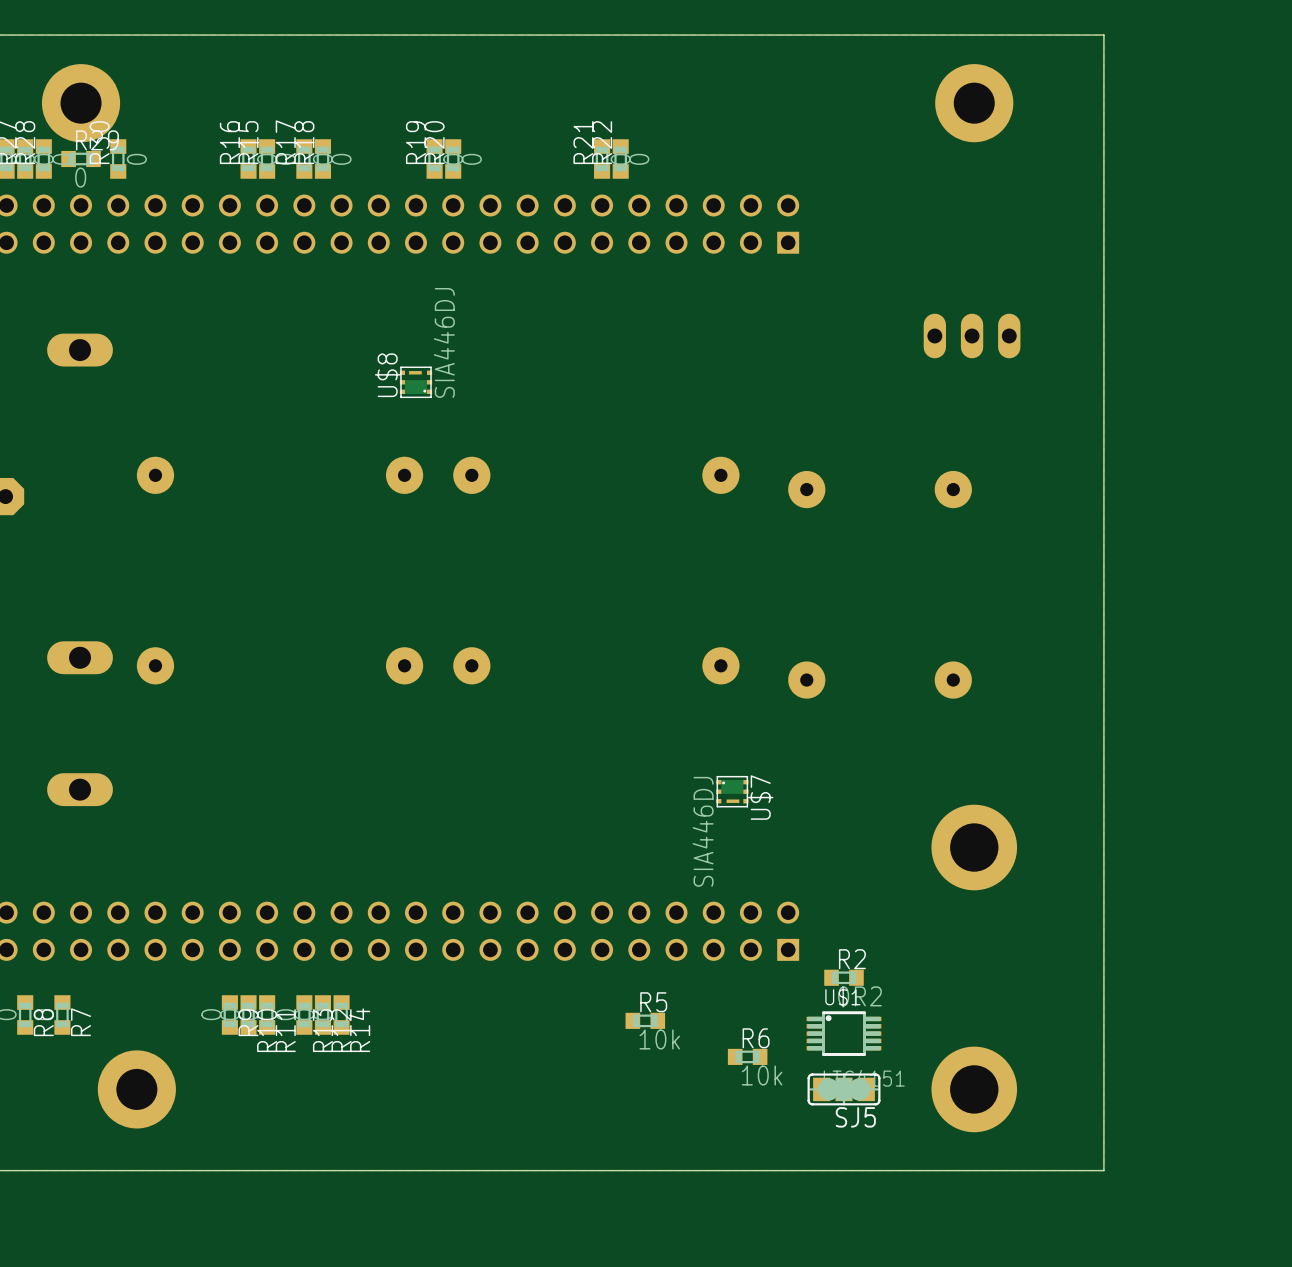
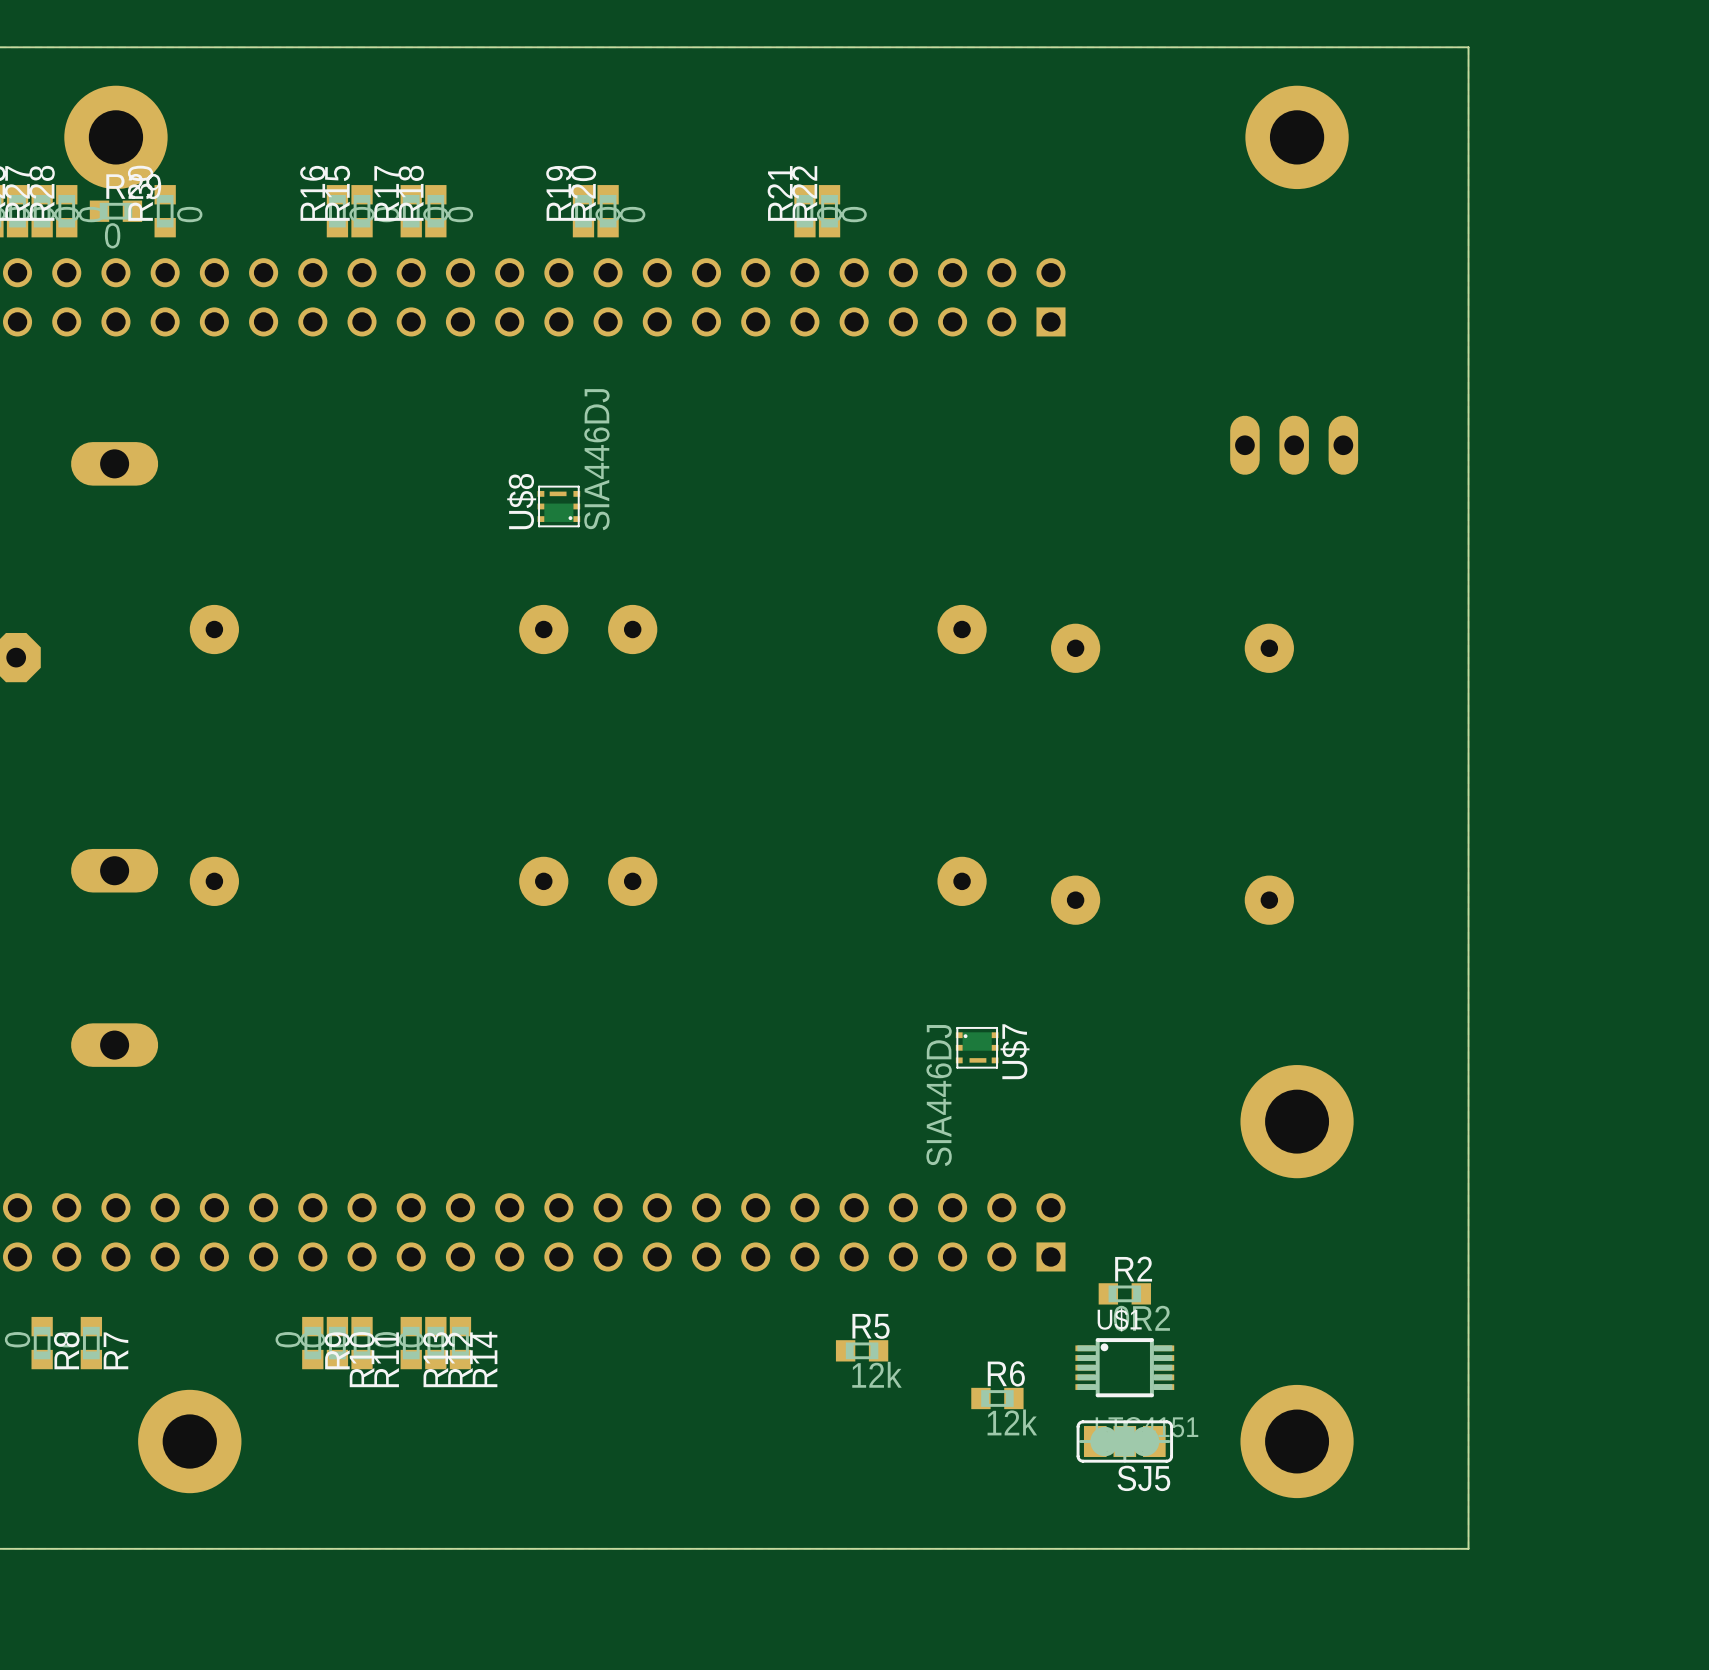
R5 value: 10k (659, 1039) -> 12k (876, 1374)
R6 value: 10k (762, 1075) -> 12k (1012, 1422)

